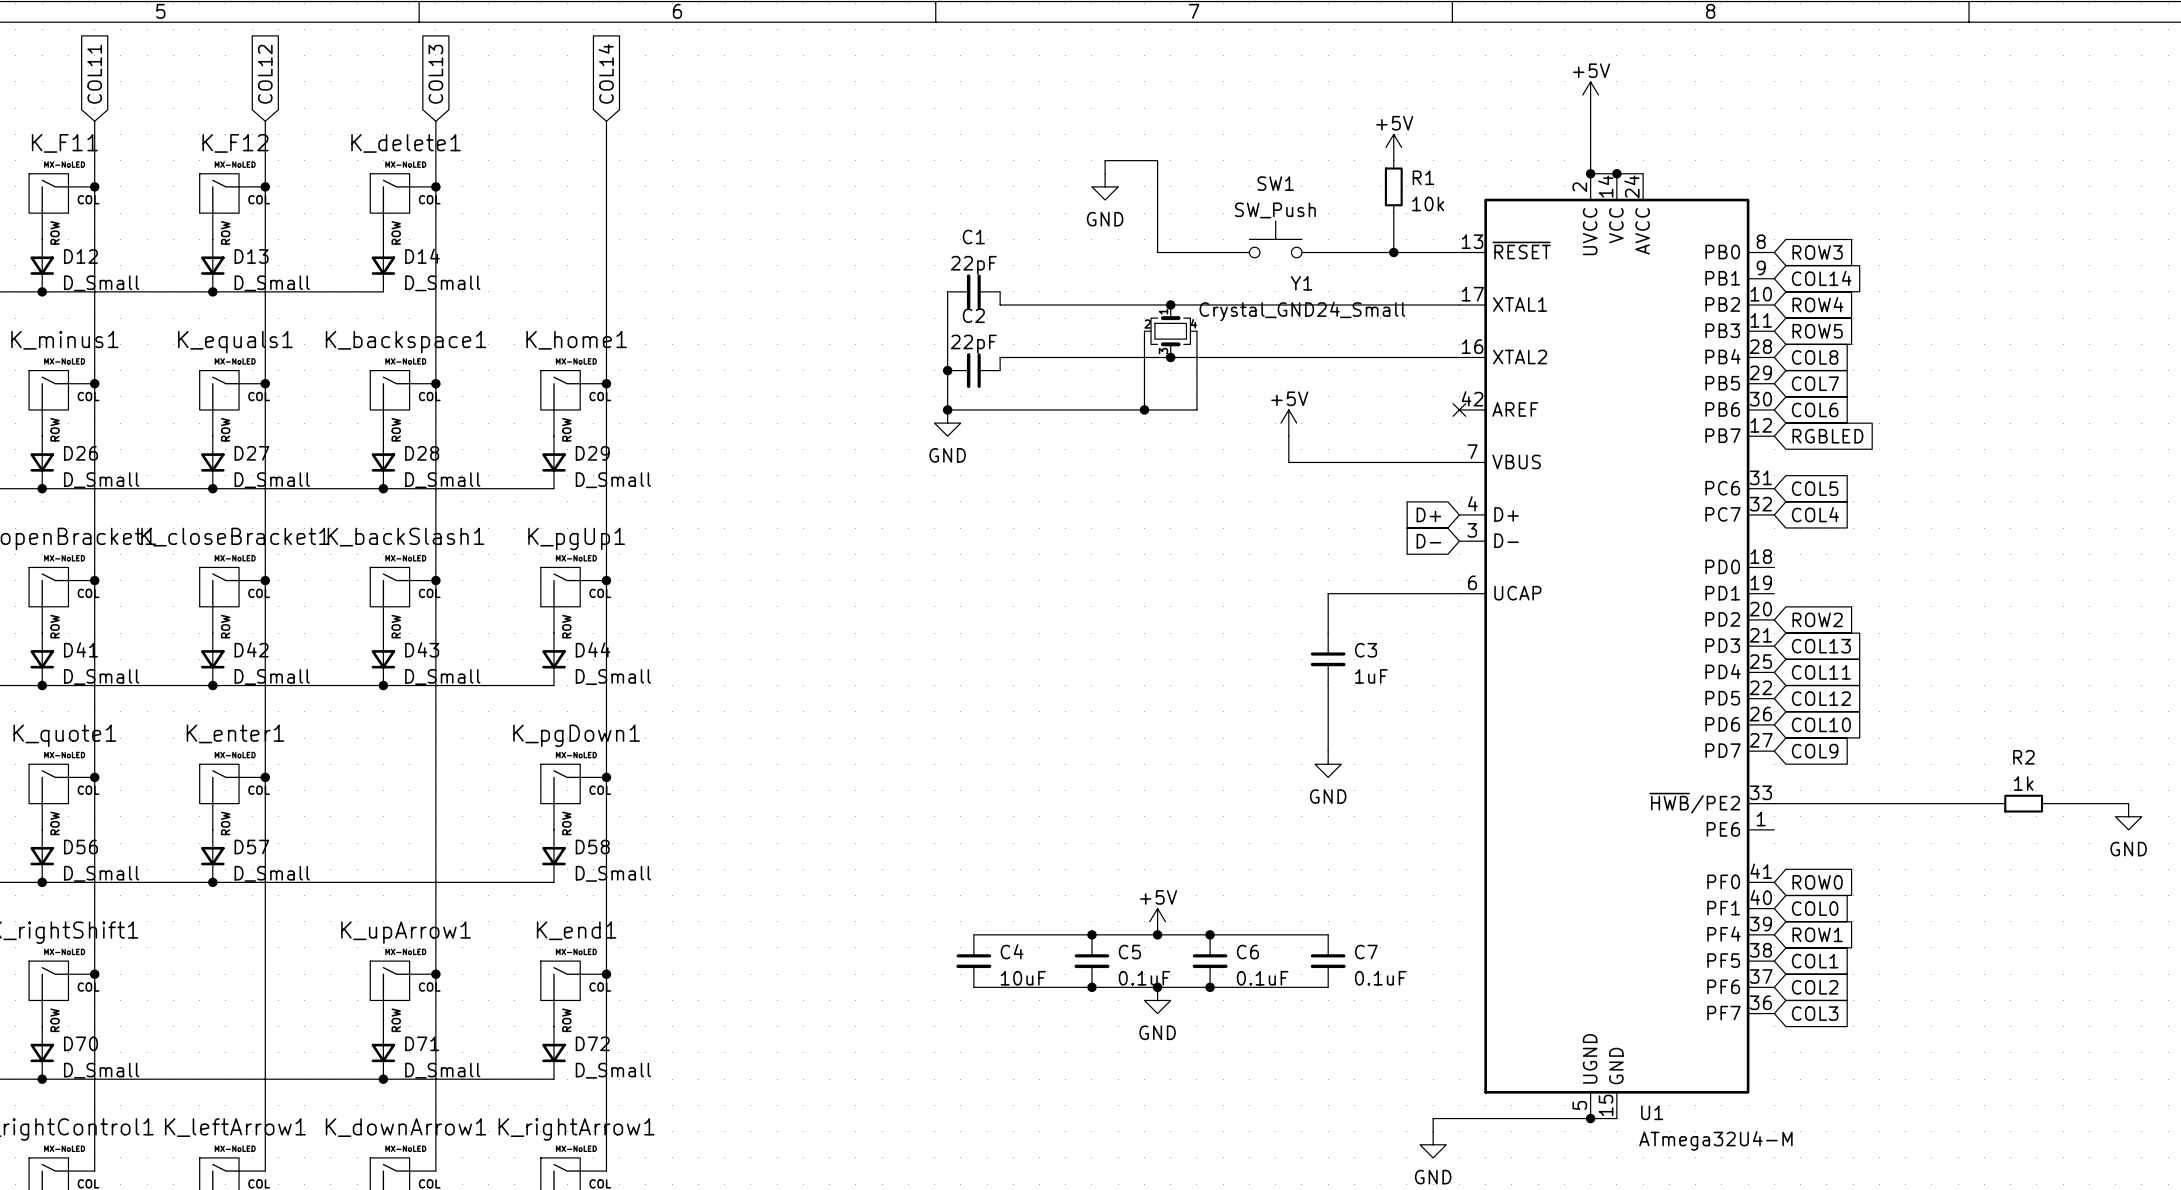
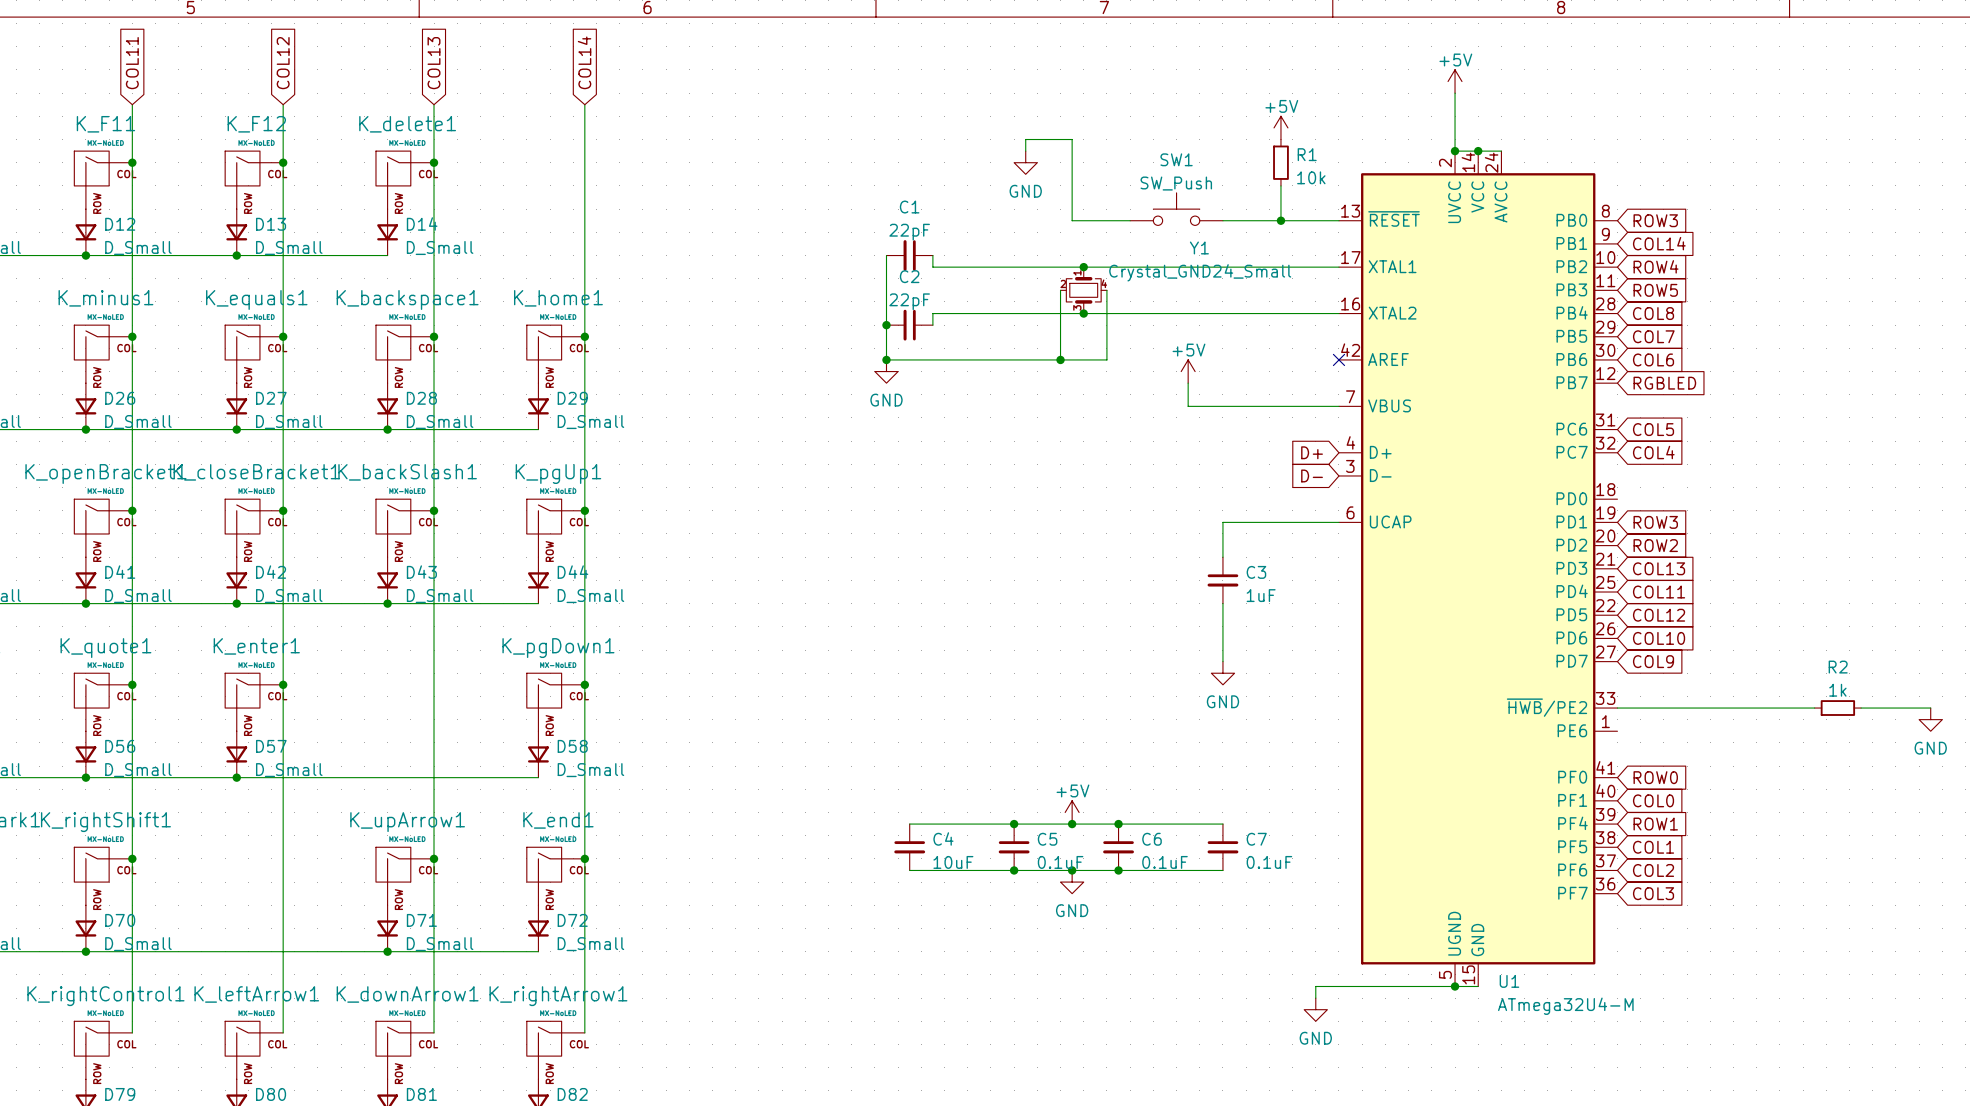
global label: none -> ROW3 (1655, 522)

